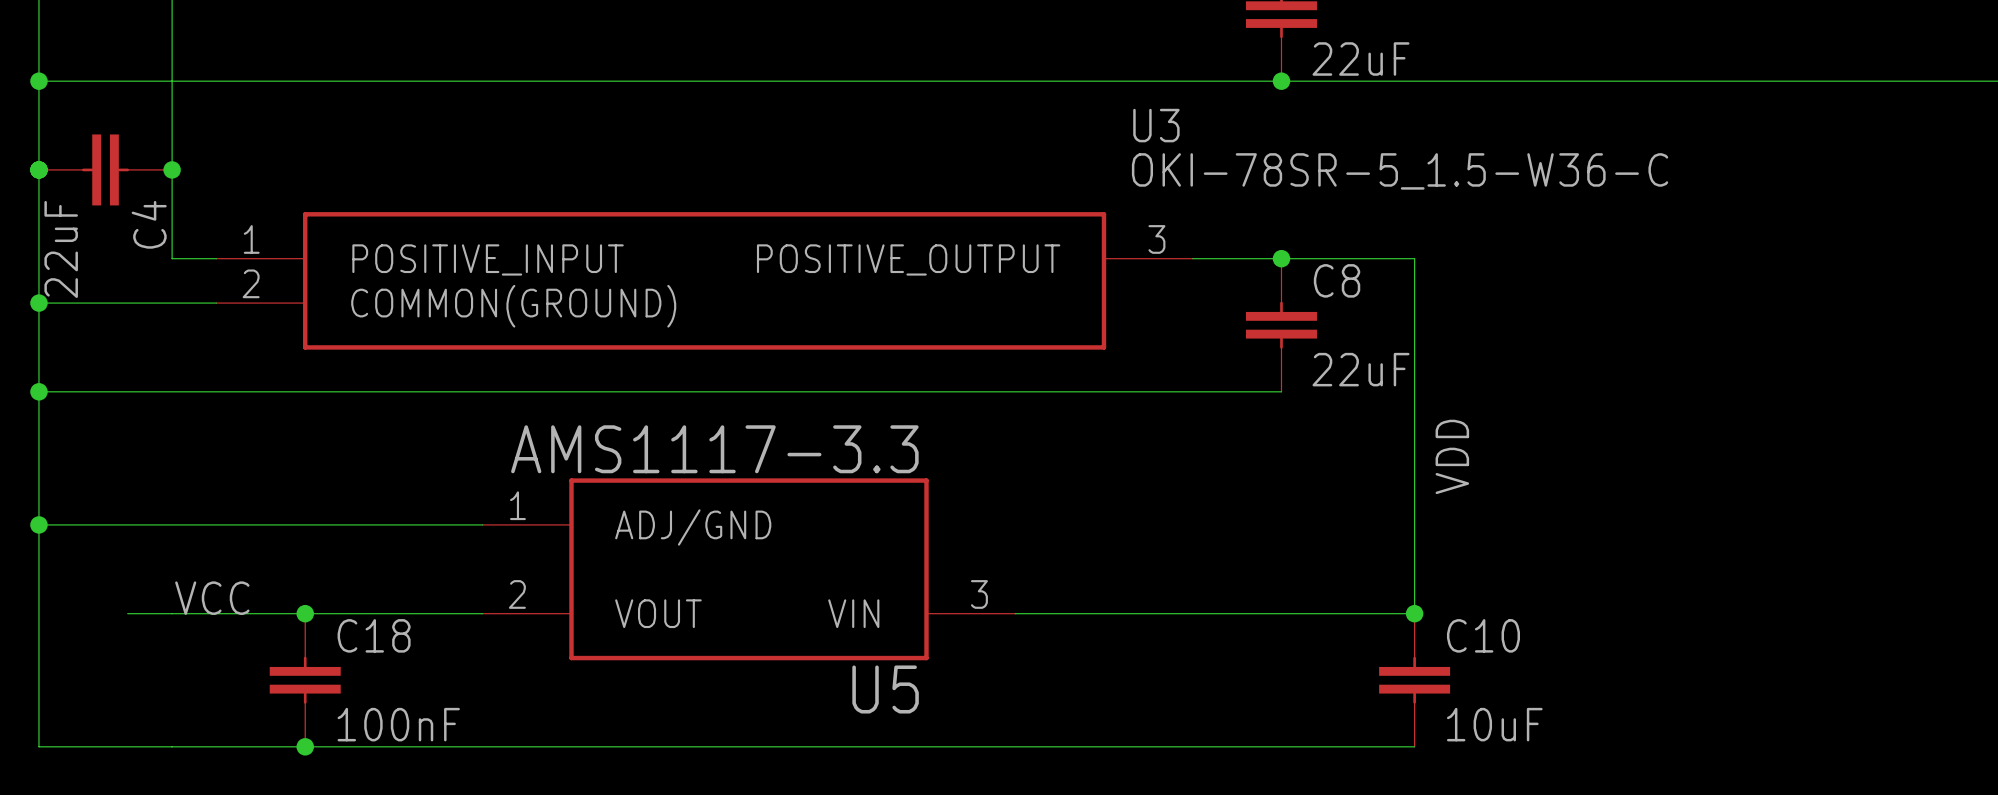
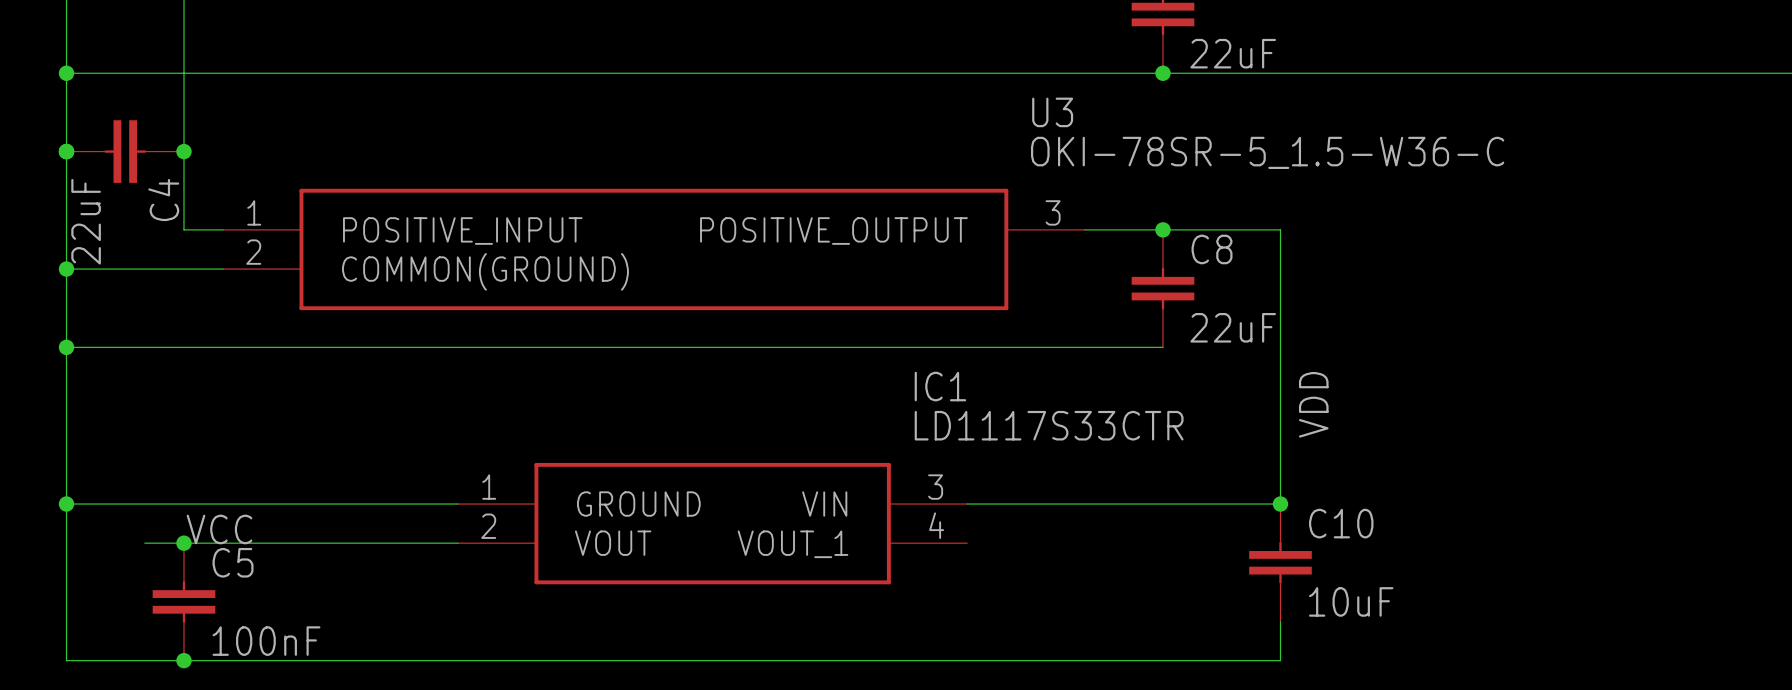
wire: (38, 524) (482, 524) -> (66, 504) (458, 504)
junction position: (38, 524) -> (66, 504)
U5: AMS1117-3.3 (748, 569) -> none
wire: (1414, 569) (1414, 613) (1015, 613) -> (1280, 504) (967, 504)
IC1: none -> LD1117S33CTR (712, 523)
junction: none -> (183, 543)
junction: (305, 613) -> none
junction position: (1414, 613) -> (1280, 504)
C5: none -> 100nF (183, 601)
C18: 100nF (305, 680) -> none
C10 position: (1414, 680) -> (1280, 562)
junction: none -> (183, 660)
junction: (305, 746) -> none

